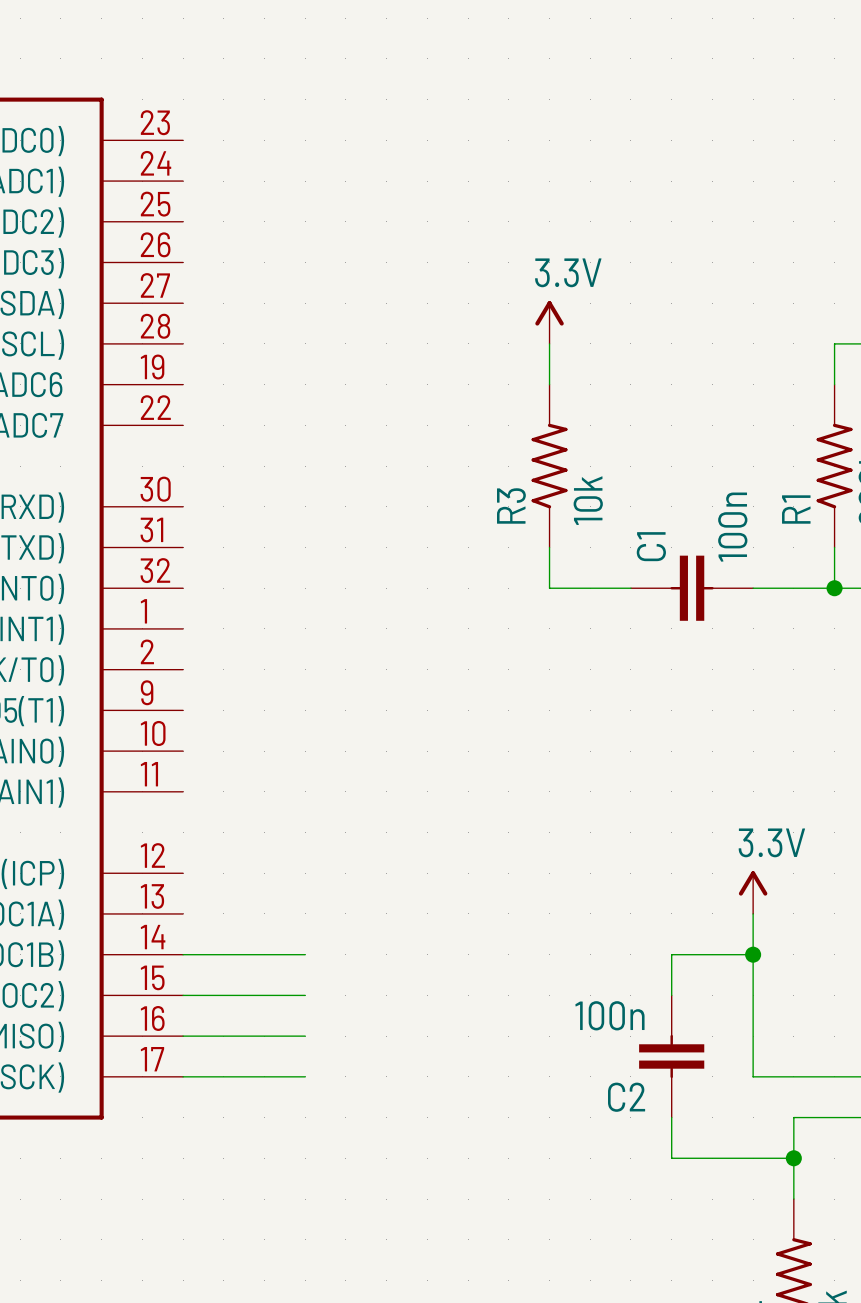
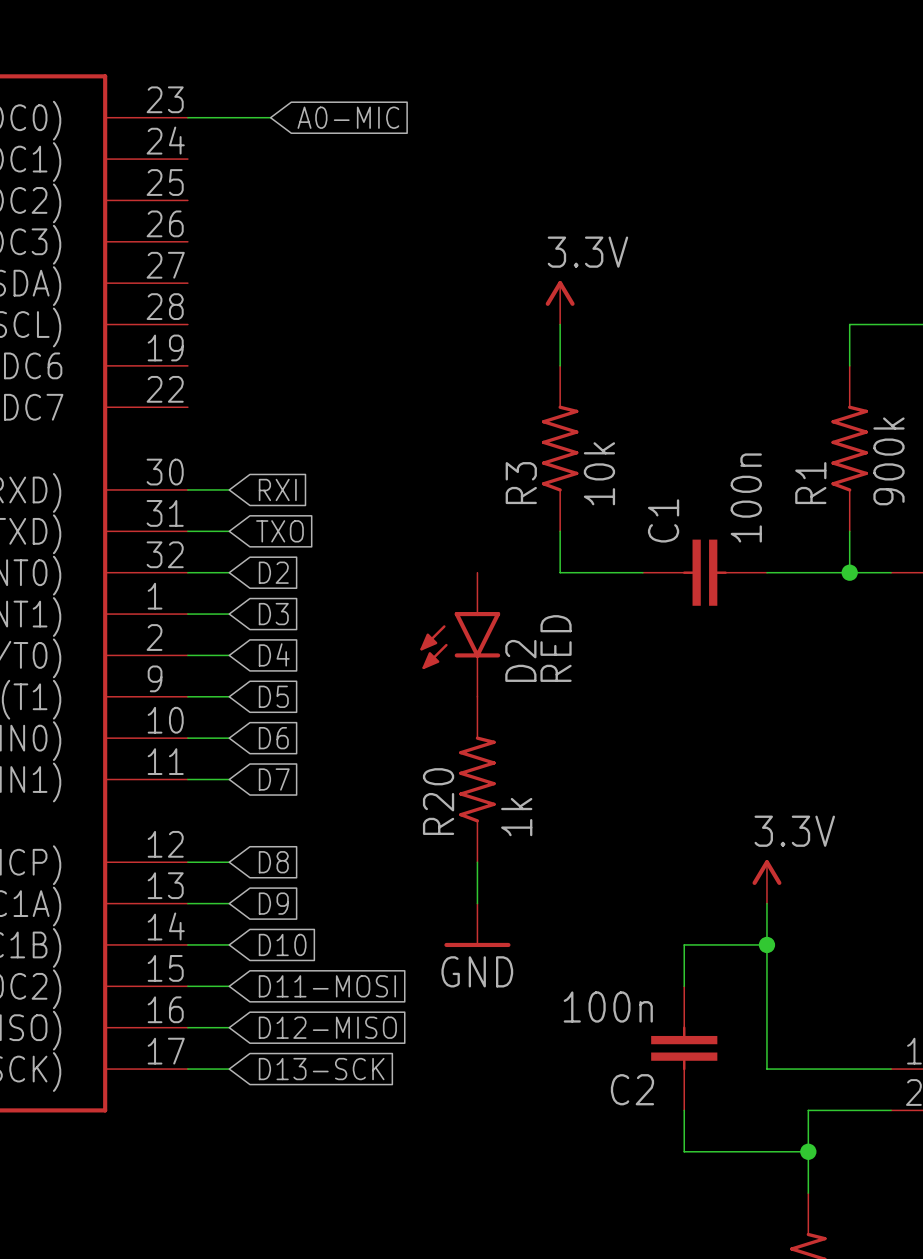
wire: none -> (187, 117) (270, 117)
global label: none -> A0-MIC (348, 117)
wire: none -> (187, 489) (229, 489)
global label: none -> RXI (277, 489)
wire: none -> (187, 531) (229, 531)
global label: none -> TXO (279, 531)
wire: none -> (187, 572) (229, 572)
global label: none -> D2 (273, 572)
wire: none -> (187, 614) (229, 614)
global label: none -> D3 (273, 614)
D2: none -> RED (460, 634)
wire: none -> (187, 655) (229, 655)
global label: none -> D4 (274, 654)
wire: none -> (187, 696) (229, 696)
global label: none -> D5 (273, 696)
wire: none -> (187, 738) (229, 738)
global label: none -> D6 (273, 738)
wire: none -> (187, 779) (229, 779)
global label: none -> D7 (274, 779)
R20: none -> 1k (477, 779)
wire: none -> (187, 862) (229, 862)
global label: none -> D8 (273, 862)
wire: none -> (477, 862) (477, 903)
wire: none -> (187, 903) (229, 903)
global label: none -> D9 (273, 903)
power symbol: none -> GND (477, 925)
wire: (223, 954) (305, 954) -> none
global label: none -> D10 (282, 944)
wire: (223, 995) (305, 995) -> none
global label: none -> D11-MOSI (327, 986)
wire: (223, 1036) (305, 1036) -> none
global label: none -> D12-MISO (327, 1027)
wire: (223, 1076) (305, 1076) -> none
global label: none -> D13-SCK (321, 1069)

